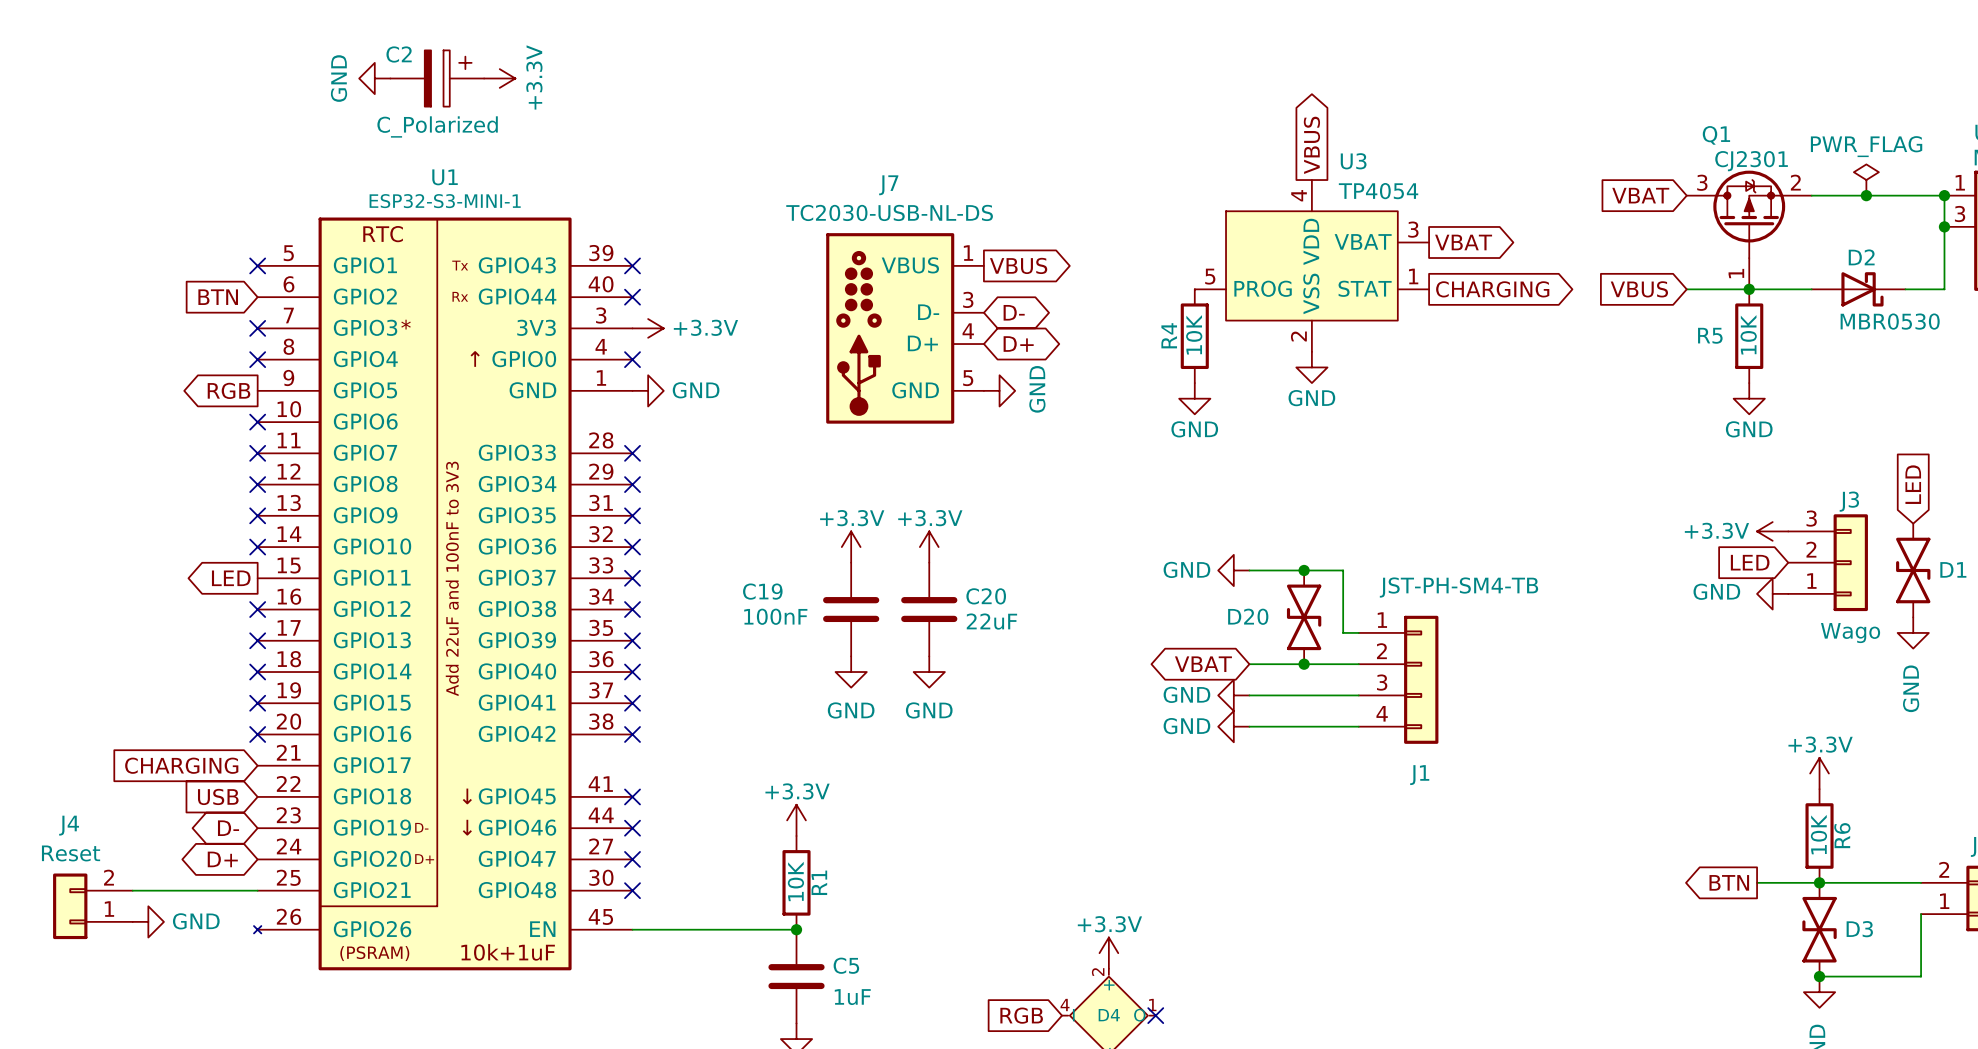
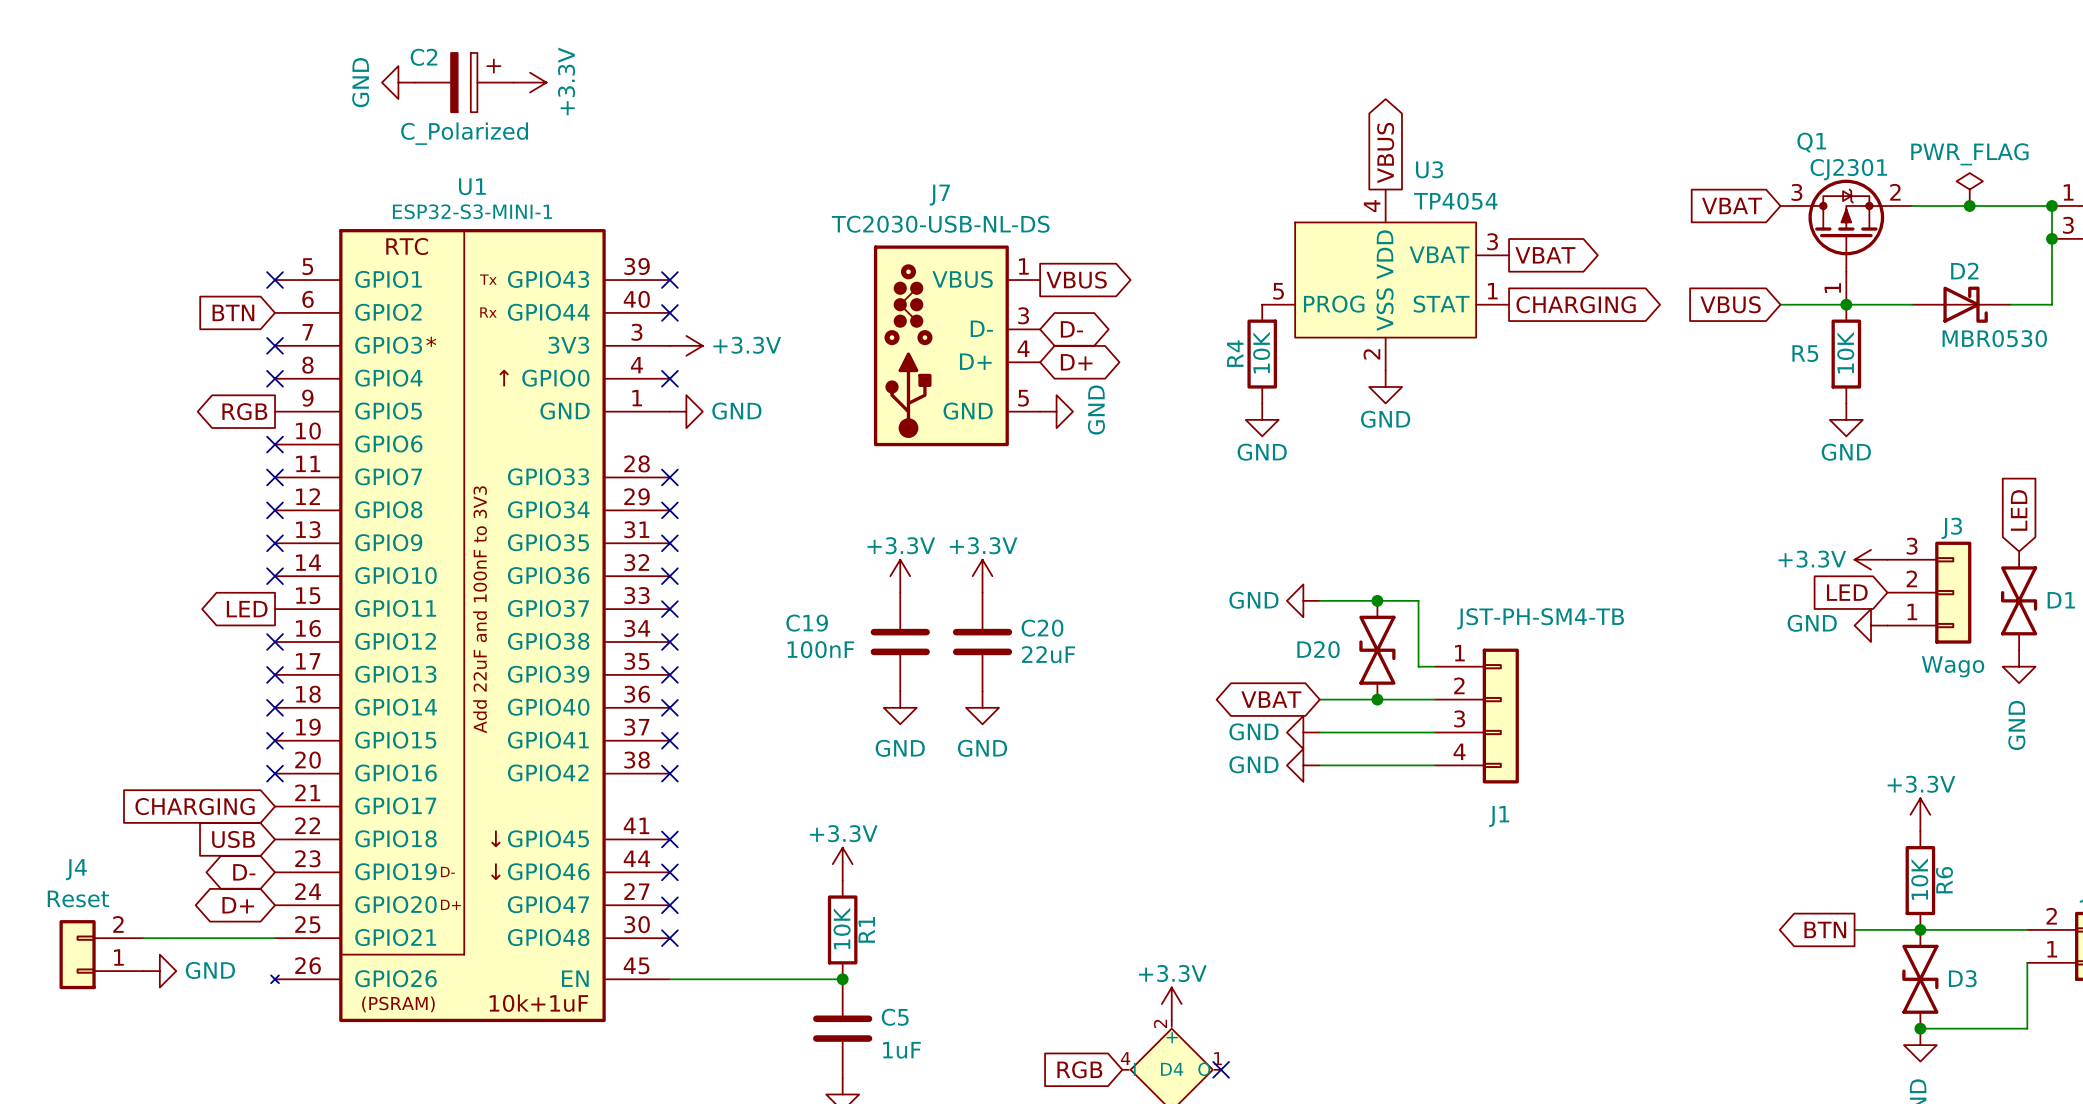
J7 symbol: [826, 233, 984, 424] -> [873, 245, 1041, 447]

